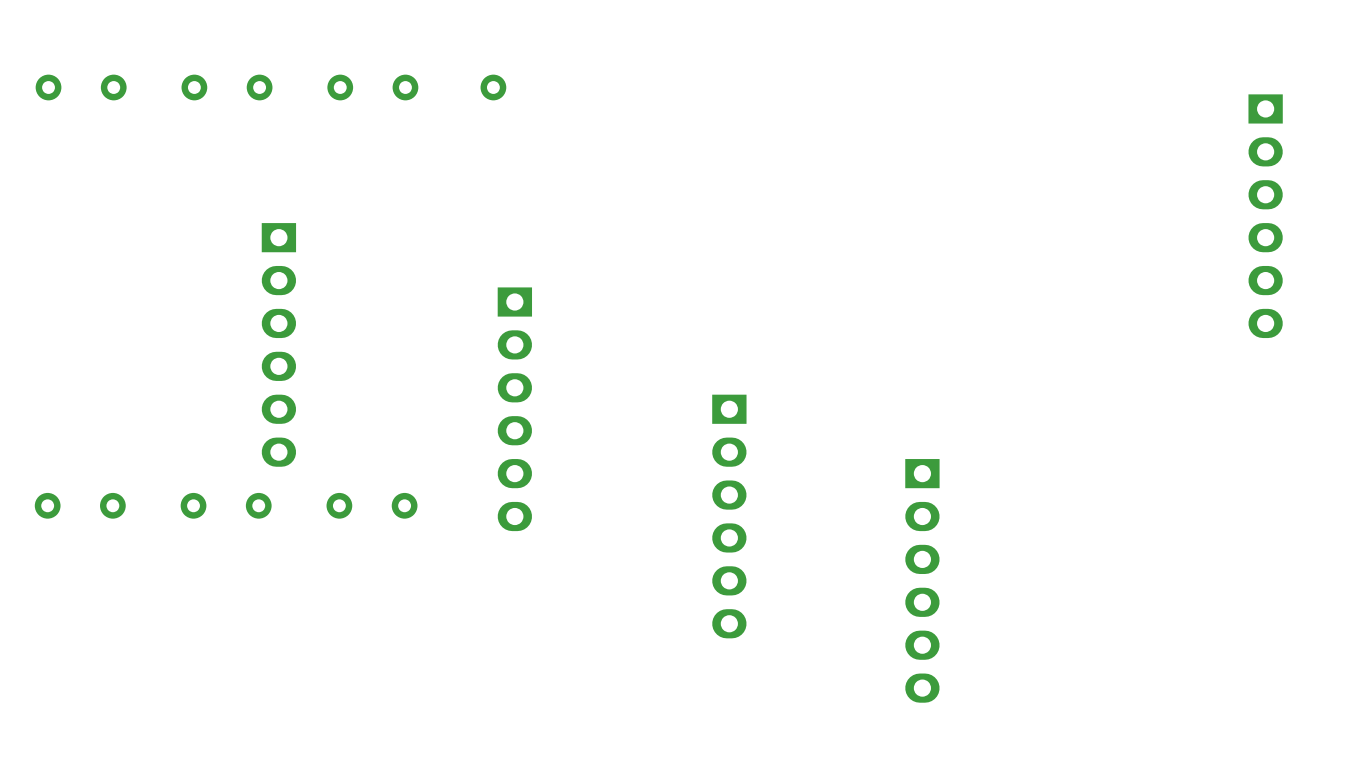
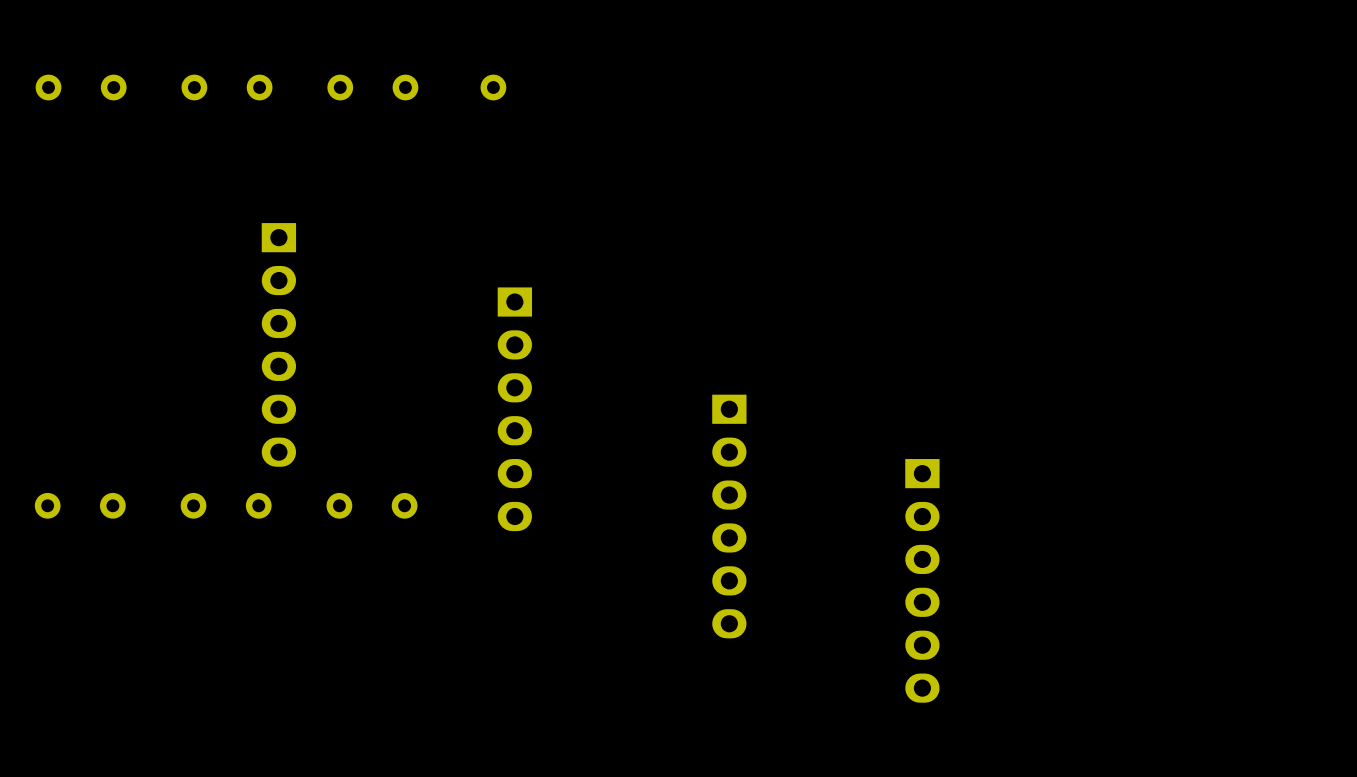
part: (1265, 216) -> none

